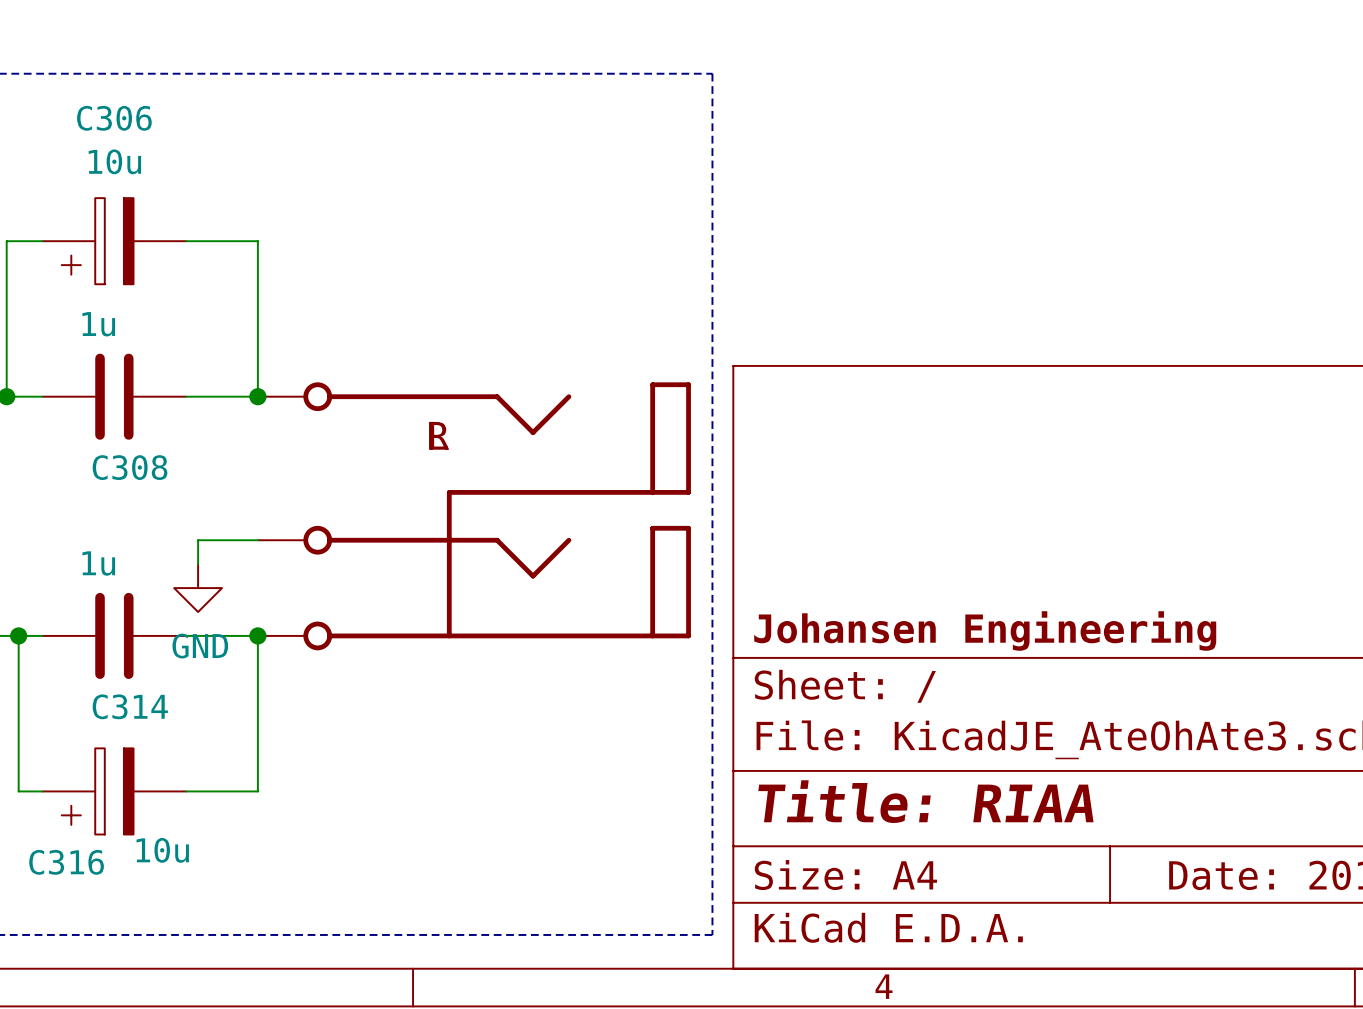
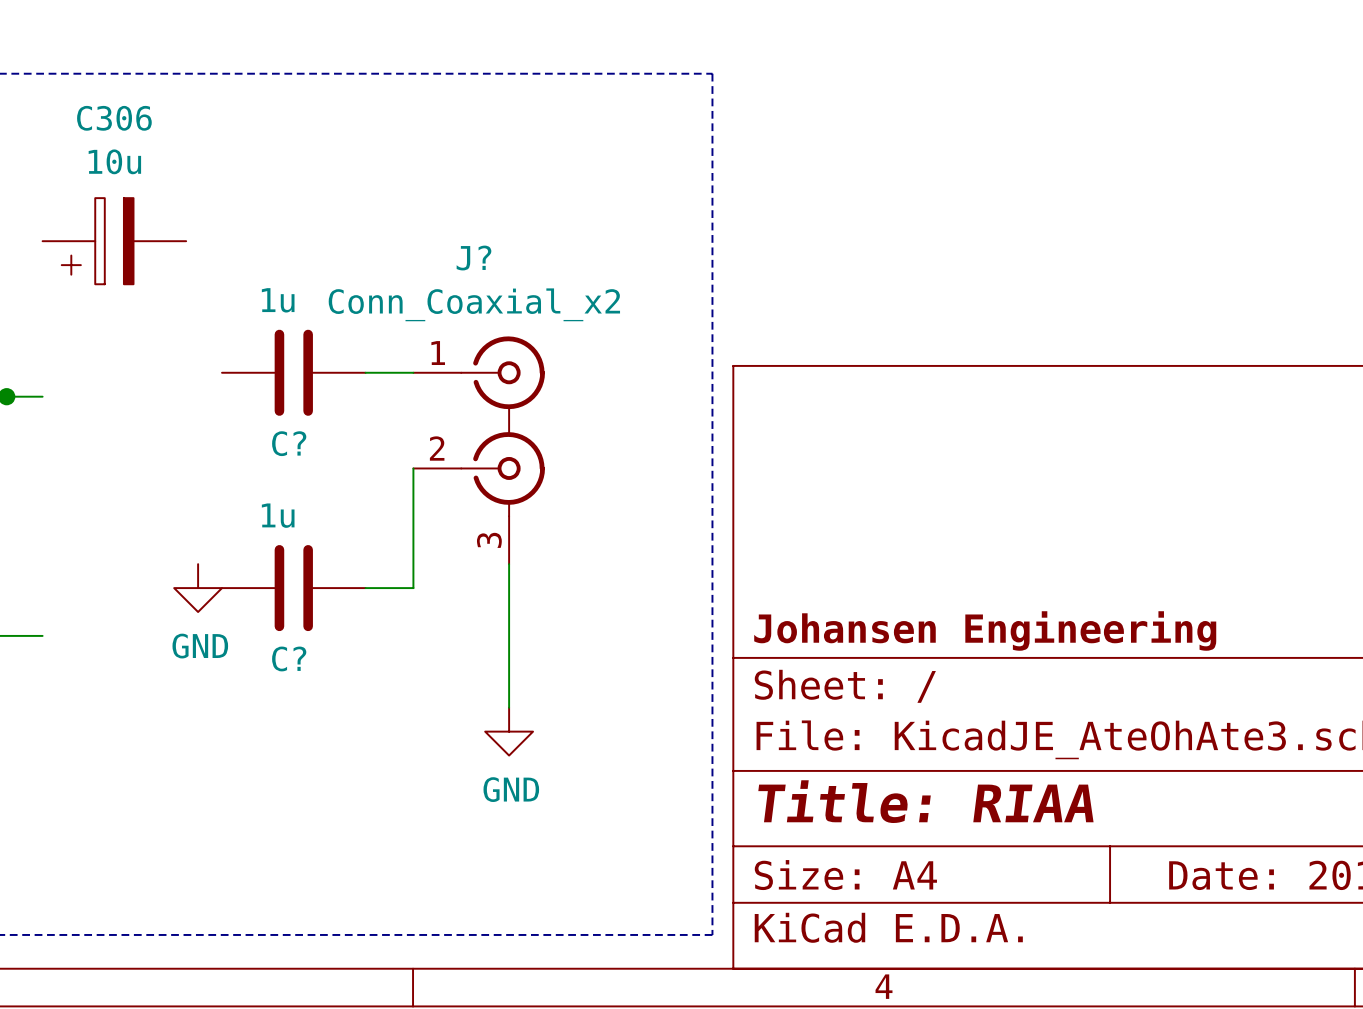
wire: (42, 241) (6, 241) (6, 396) -> none
wire: (186, 241) (257, 241) (257, 396) (186, 396) -> none
C?: none -> 1u (293, 372)
wire: none -> (365, 372) (413, 372)
C308: 1u (114, 396) -> none
junction: (257, 396) -> none
J?: none -> Conn_Coaxial_x2 (479, 450)
wire: none -> (413, 468) (413, 588) (365, 588)
part: (474, 516) -> none
wire: (257, 540) (198, 540) (198, 564) -> none
wire: none -> (509, 564) (509, 707)
C?: none -> 1u (293, 588)
wire: (18, 635) (18, 791) (42, 791) -> none
junction: (18, 635) -> none
C314: 1u (114, 635) -> none
wire: (186, 635) (257, 635) (257, 791) (186, 791) -> none
junction: (257, 635) -> none
power symbol: none -> GND (509, 731)
C316: 10u (114, 791) -> none

